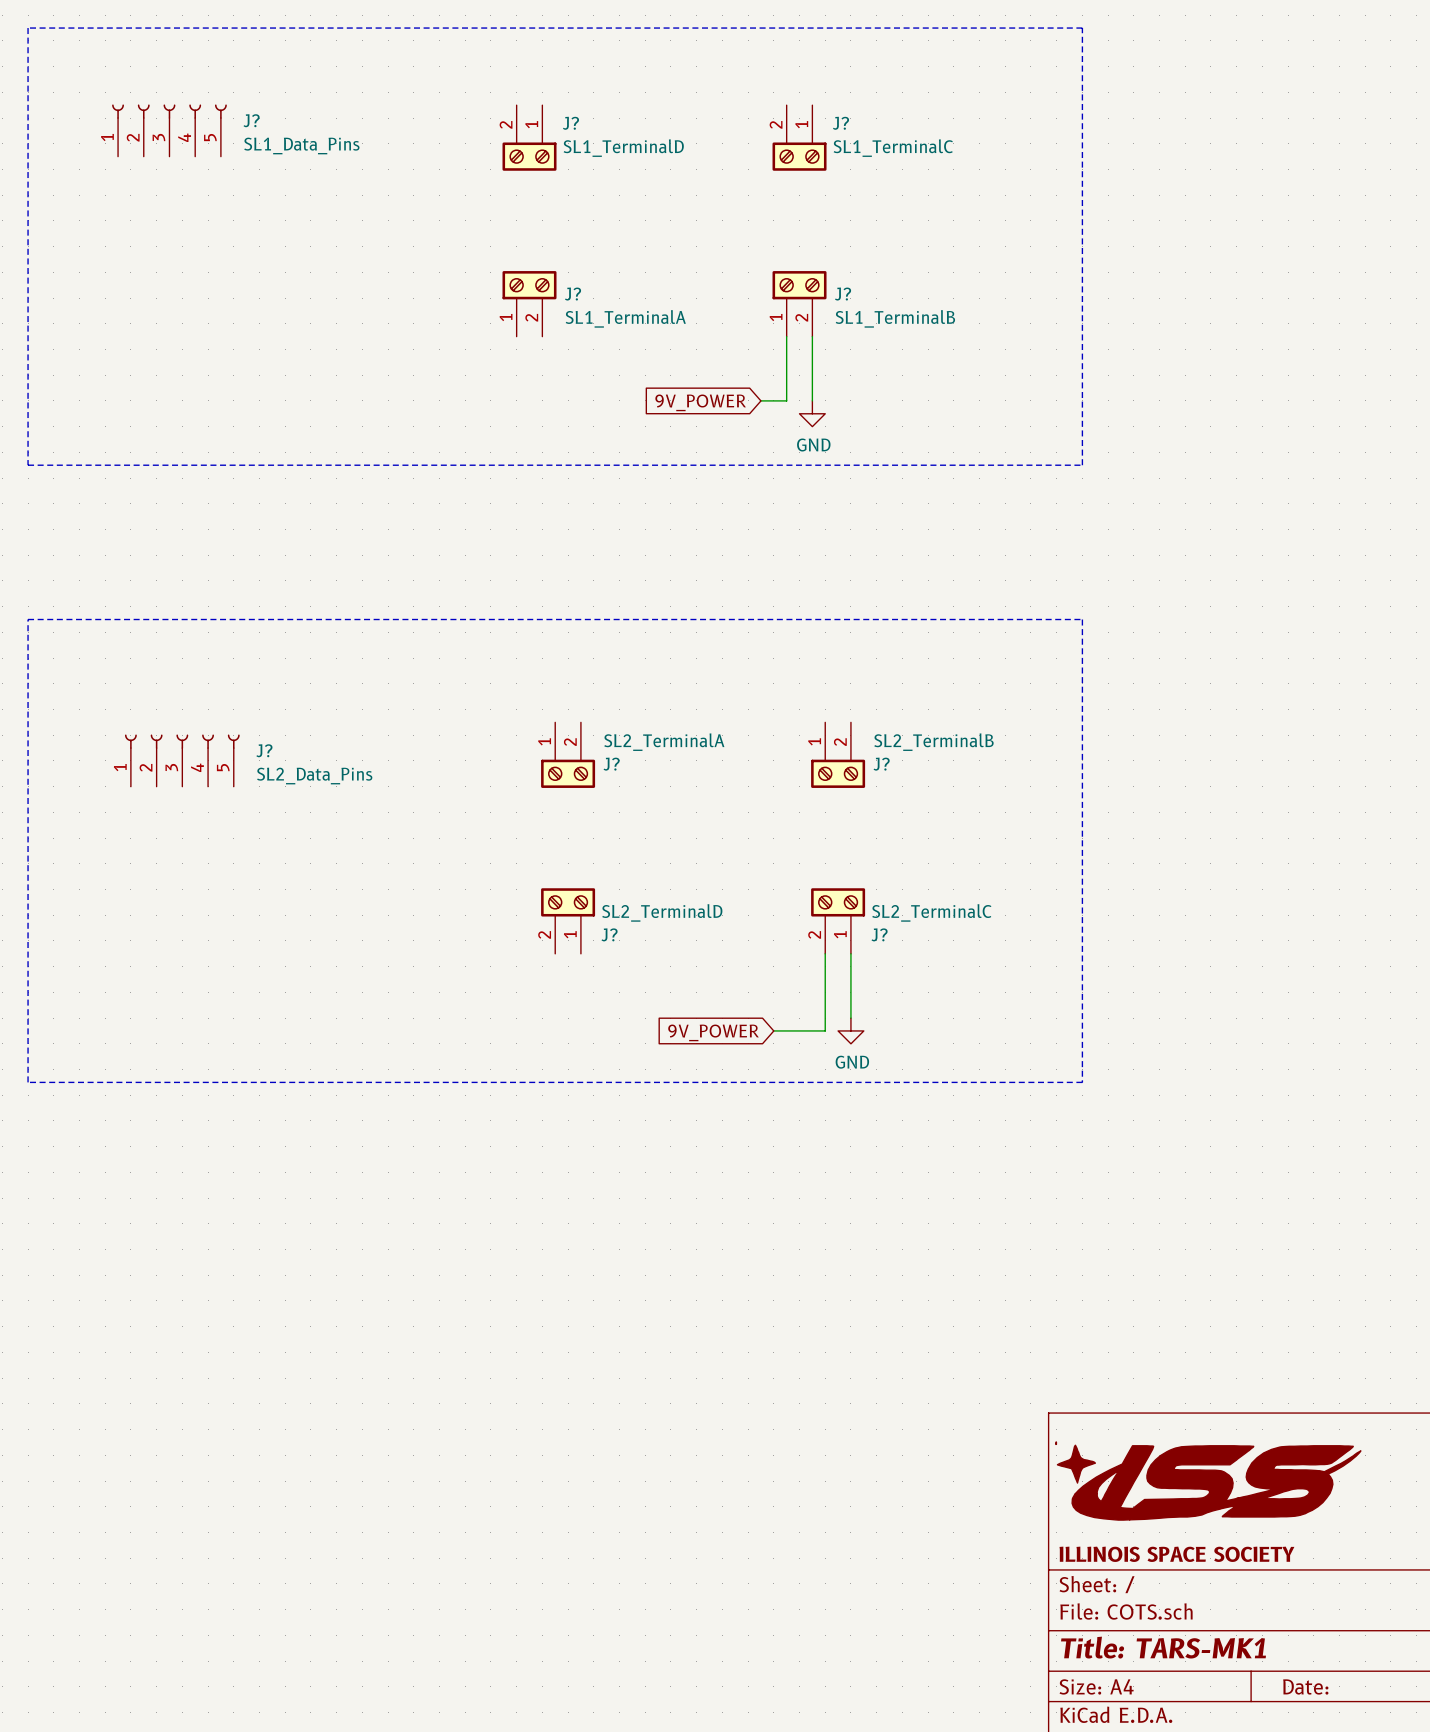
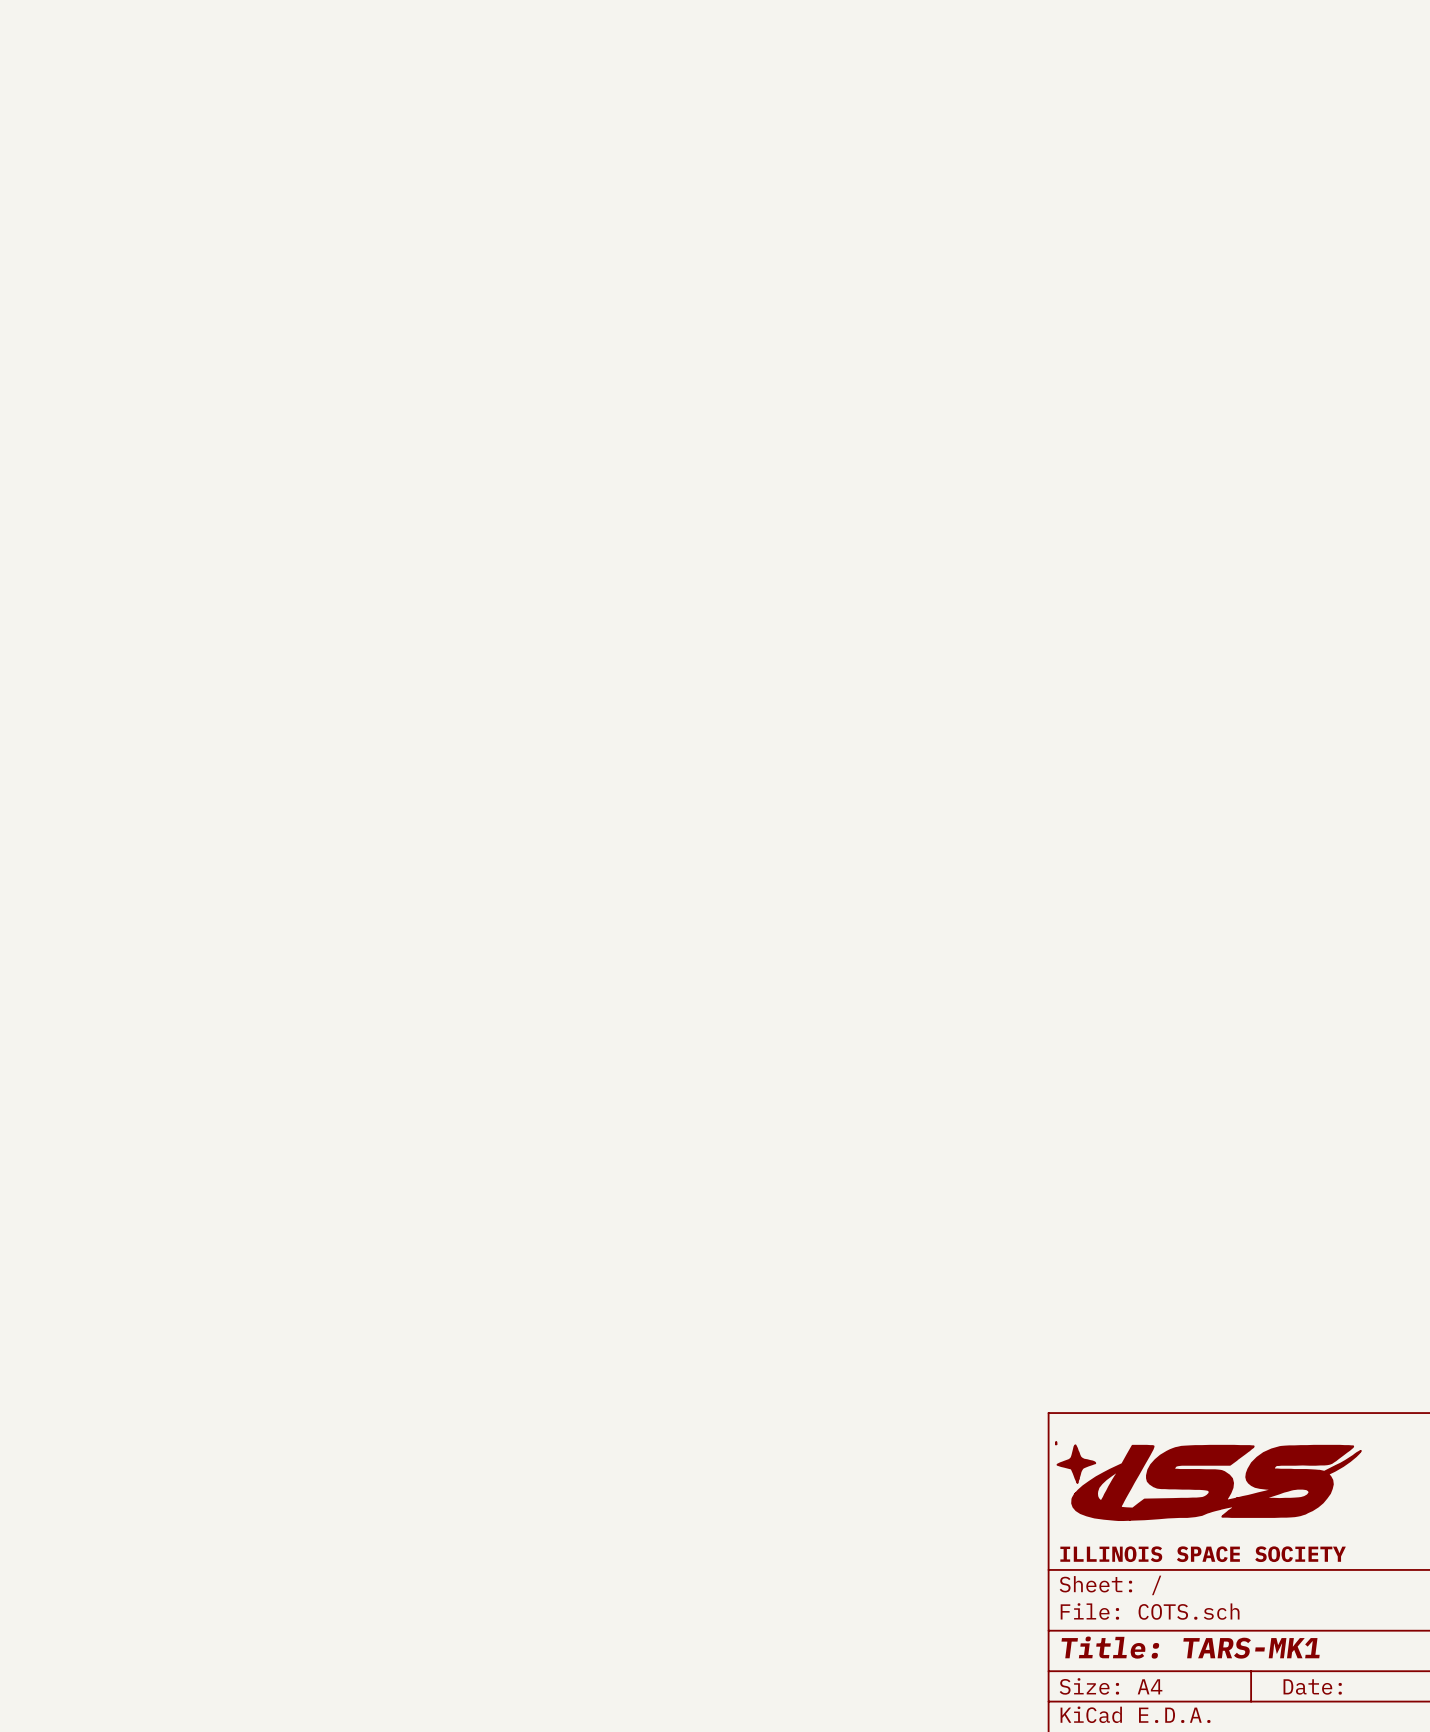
line: (28, 28) (28, 465) (1082, 465) (1082, 28) (28, 28) -> none
J?: SL1_Data_Pins (169, 130) -> none
J?: SL1_TerminalD (529, 137) -> none
J?: SL1_TerminalC (799, 137) -> none
J?: SL1_TerminalA (529, 303) -> none
J?: SL1_TerminalB (799, 303) -> none
wire: (786, 336) (786, 400) (760, 400) -> none
wire: (812, 336) (812, 400) -> none
global label: 9V_POWER (700, 402) -> none
power symbol: GND (812, 413) -> none
line: (28, 619) (1082, 619) (1082, 1082) (28, 1082) (28, 619) -> none
J?: SL2_TerminalA (568, 755) -> none
J?: SL2_TerminalB (838, 755) -> none
J?: SL2_Data_Pins (182, 760) -> none
J?: SL2_TerminalD (568, 921) -> none
J?: SL2_TerminalC (838, 921) -> none
wire: (825, 953) (825, 1030) (773, 1030) -> none
wire: (850, 953) (850, 1018) -> none
power symbol: GND (850, 1030) -> none
global label: 9V_POWER (713, 1032) -> none

